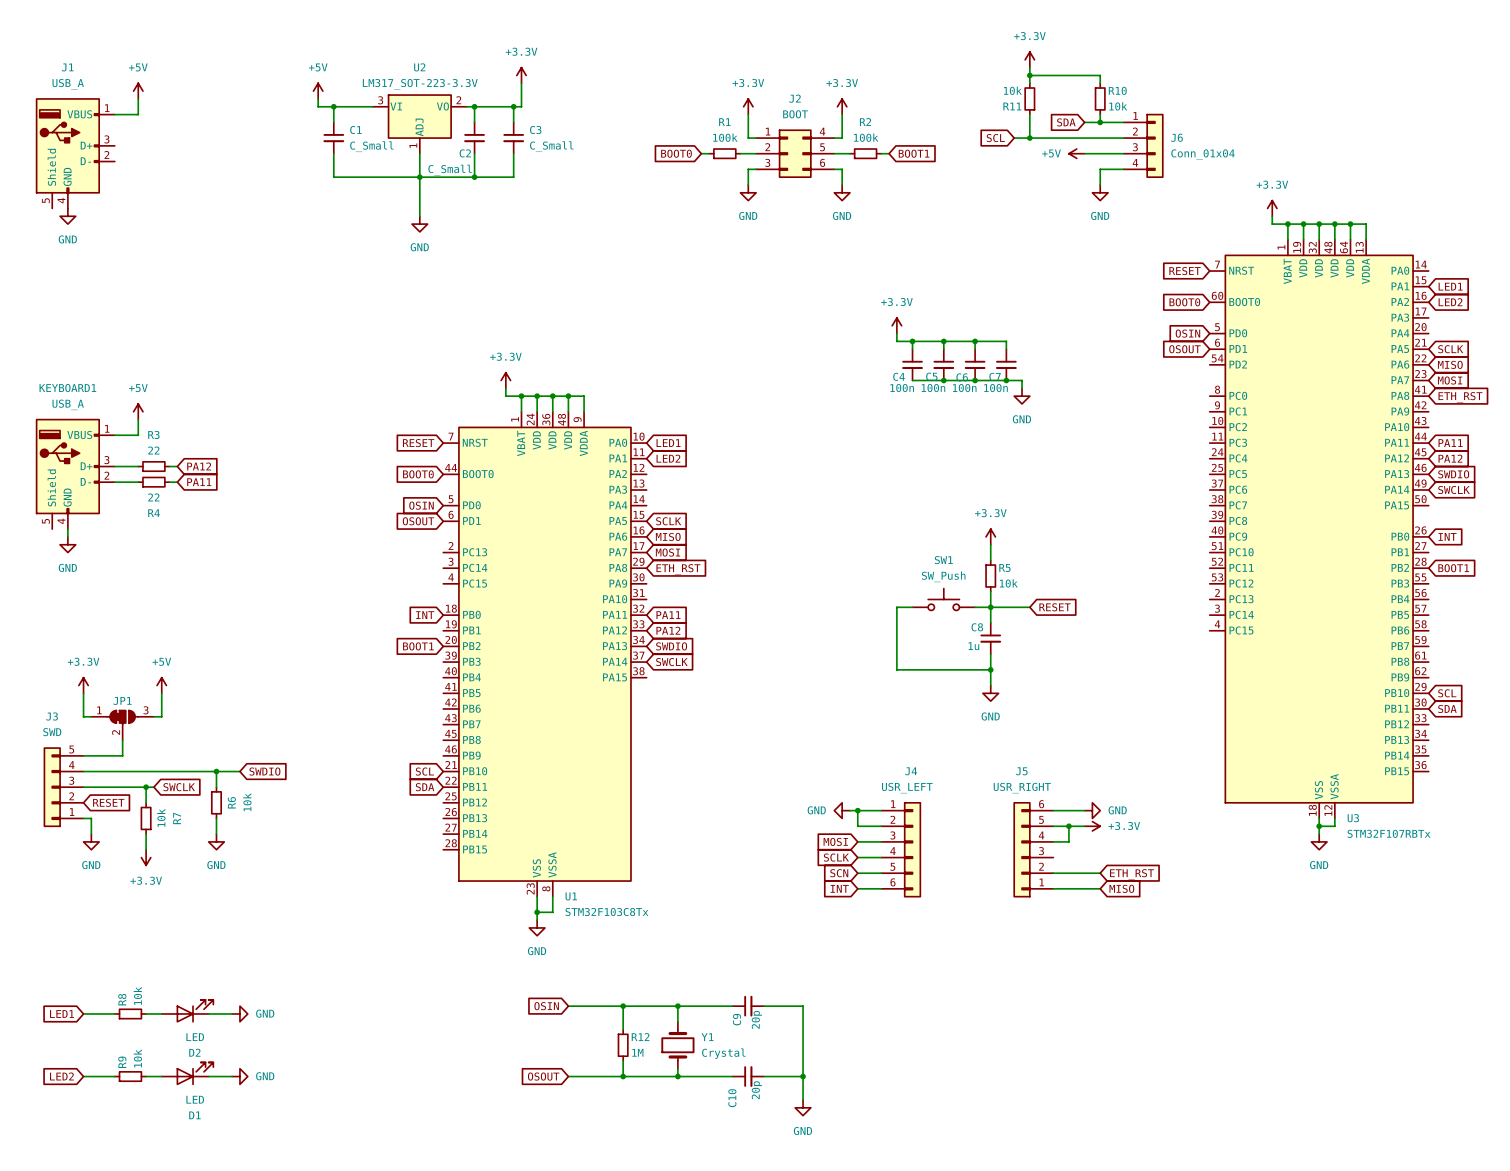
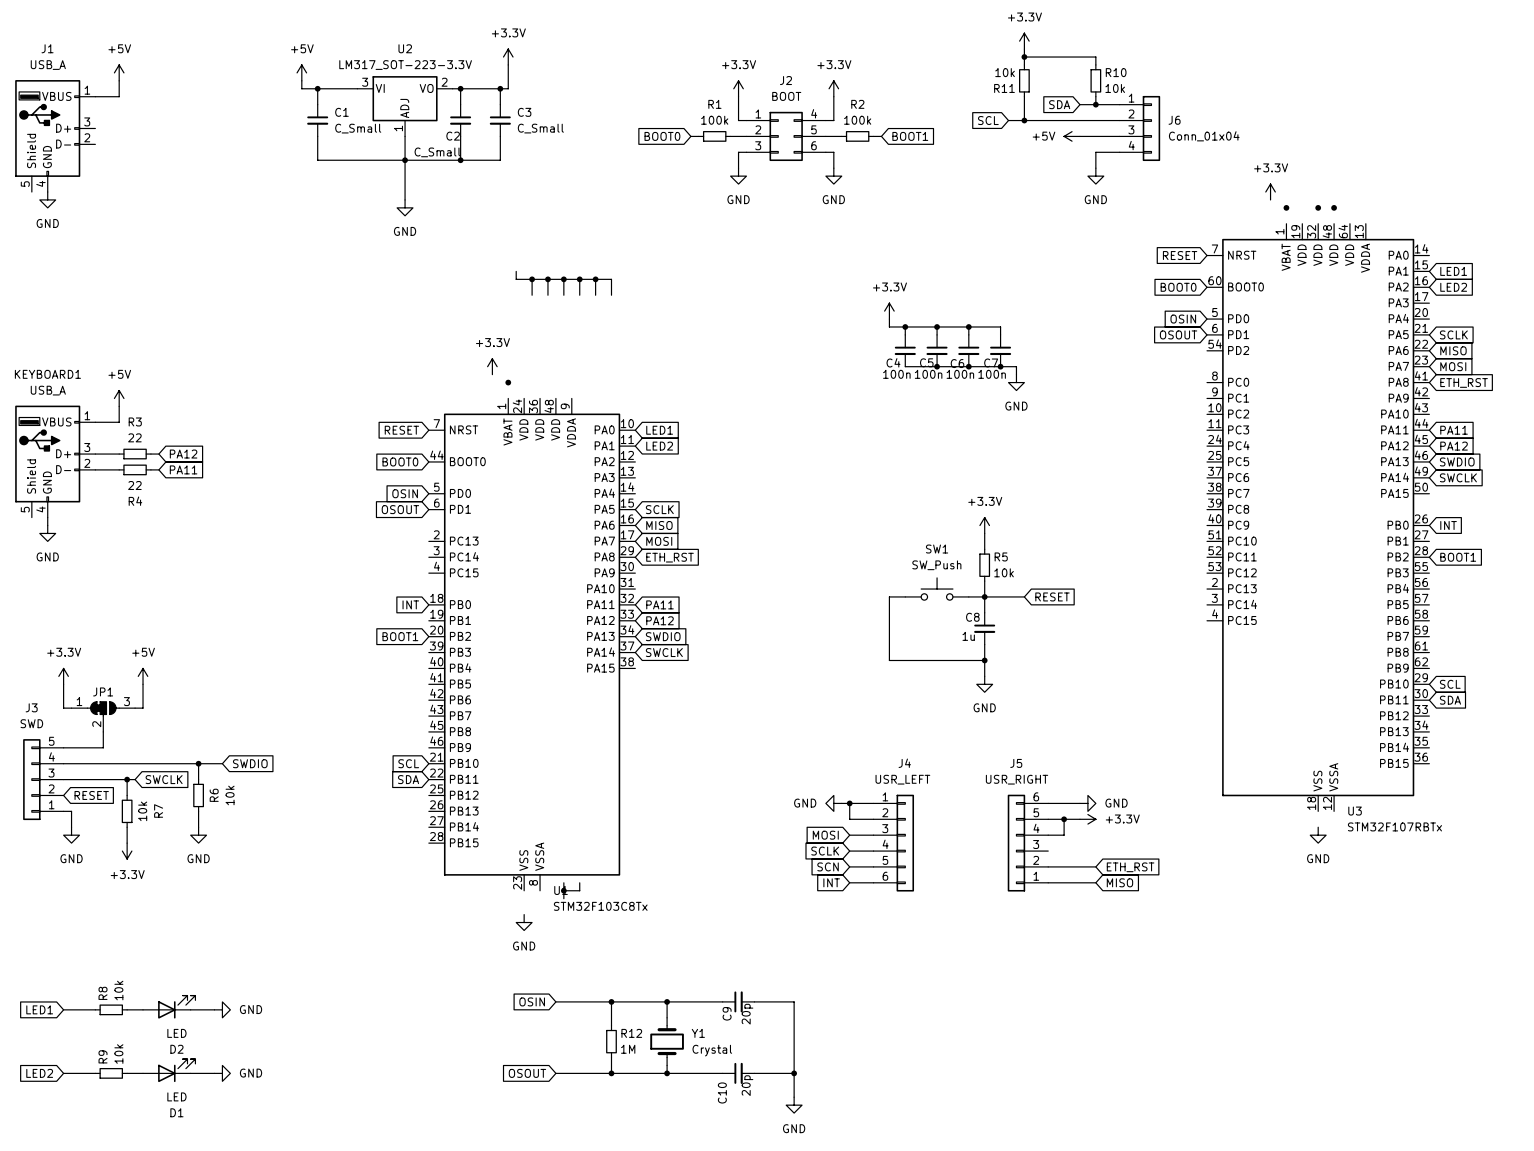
wire: (1272, 216) (1272, 224) (1366, 224) (1366, 239) -> none
wire: (1287, 224) (1287, 239) -> none
wire: (1303, 224) (1303, 239) -> none
junction: (1303, 224) -> none
wire: (1319, 224) (1319, 239) -> none
wire: (1334, 224) (1334, 239) -> none
wire: (1350, 224) (1350, 239) -> none
junction: (1350, 224) -> none
wire: none -> (516, 271) (516, 279) (611, 279) (611, 295)
junction: none -> (532, 279)
junction: none -> (547, 279)
junction: none -> (563, 279)
junction: none -> (579, 279)
wire: none -> (595, 279) (595, 295)
junction: none -> (595, 279)
wire: (505, 388) (505, 396) (584, 396) (584, 411) -> none
wire: (521, 396) (521, 411) -> (532, 279) (532, 295)
wire: (537, 396) (537, 411) -> (547, 279) (547, 295)
junction: (537, 396) -> none
wire: (552, 396) (552, 411) -> (563, 279) (563, 295)
junction: (552, 396) -> none
wire: (568, 396) (568, 411) -> (579, 279) (579, 295)
junction: (568, 396) -> none
wire: (1319, 818) (1319, 834) -> none
wire: (1334, 818) (1334, 826) (1319, 826) -> none
junction: (1319, 826) -> none
wire: none -> (563, 882) (563, 898)
wire: none -> (579, 882) (579, 890) (563, 890)
wire: (537, 896) (537, 920) -> none
wire: (552, 896) (552, 912) (537, 912) -> none
junction: none -> (563, 890)
junction: (537, 912) -> none

